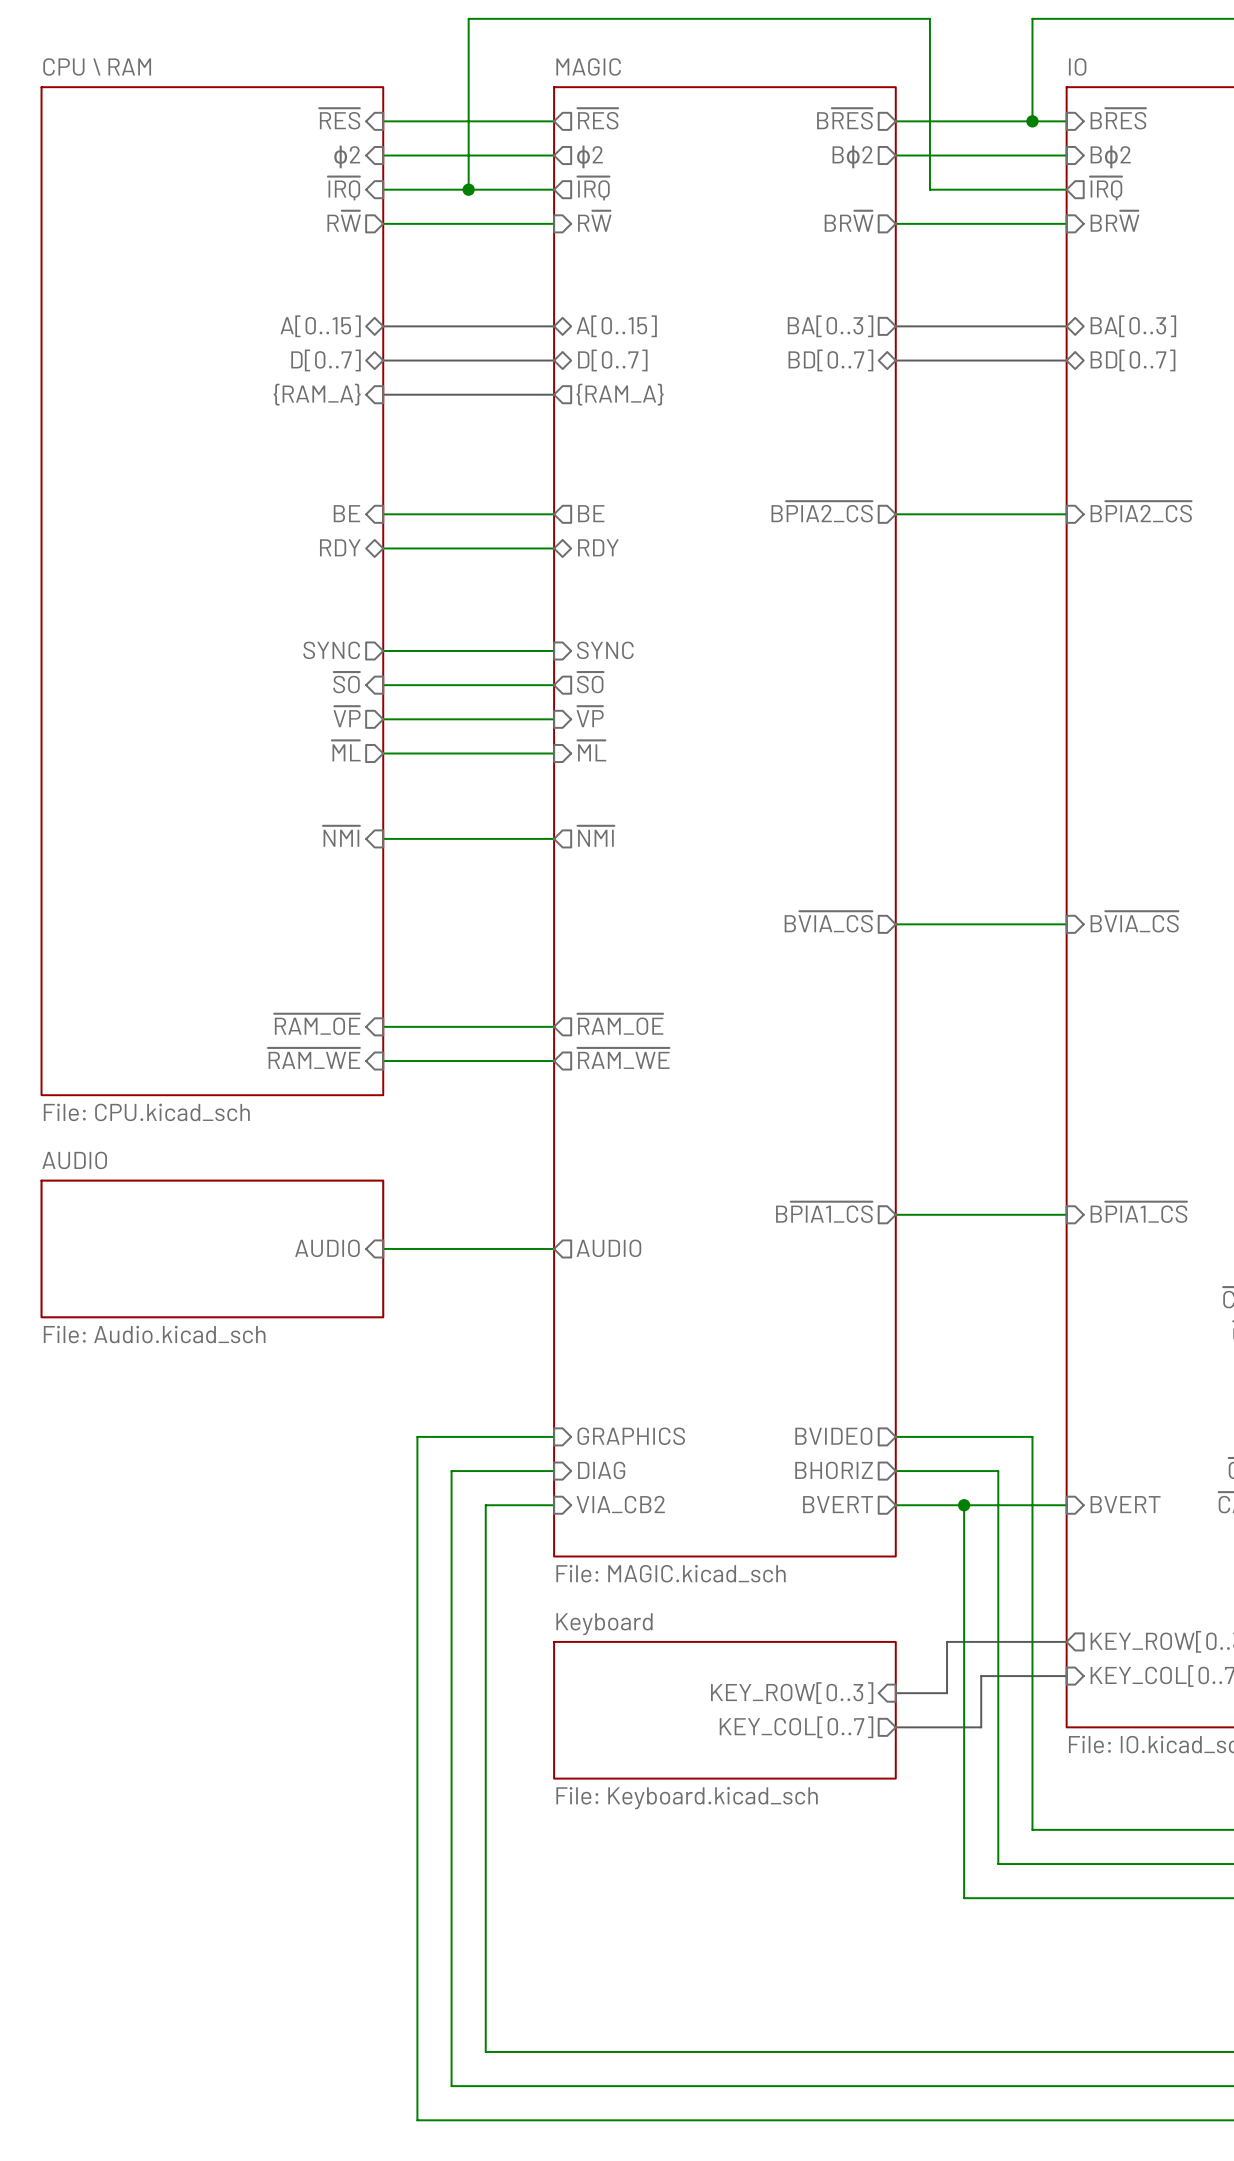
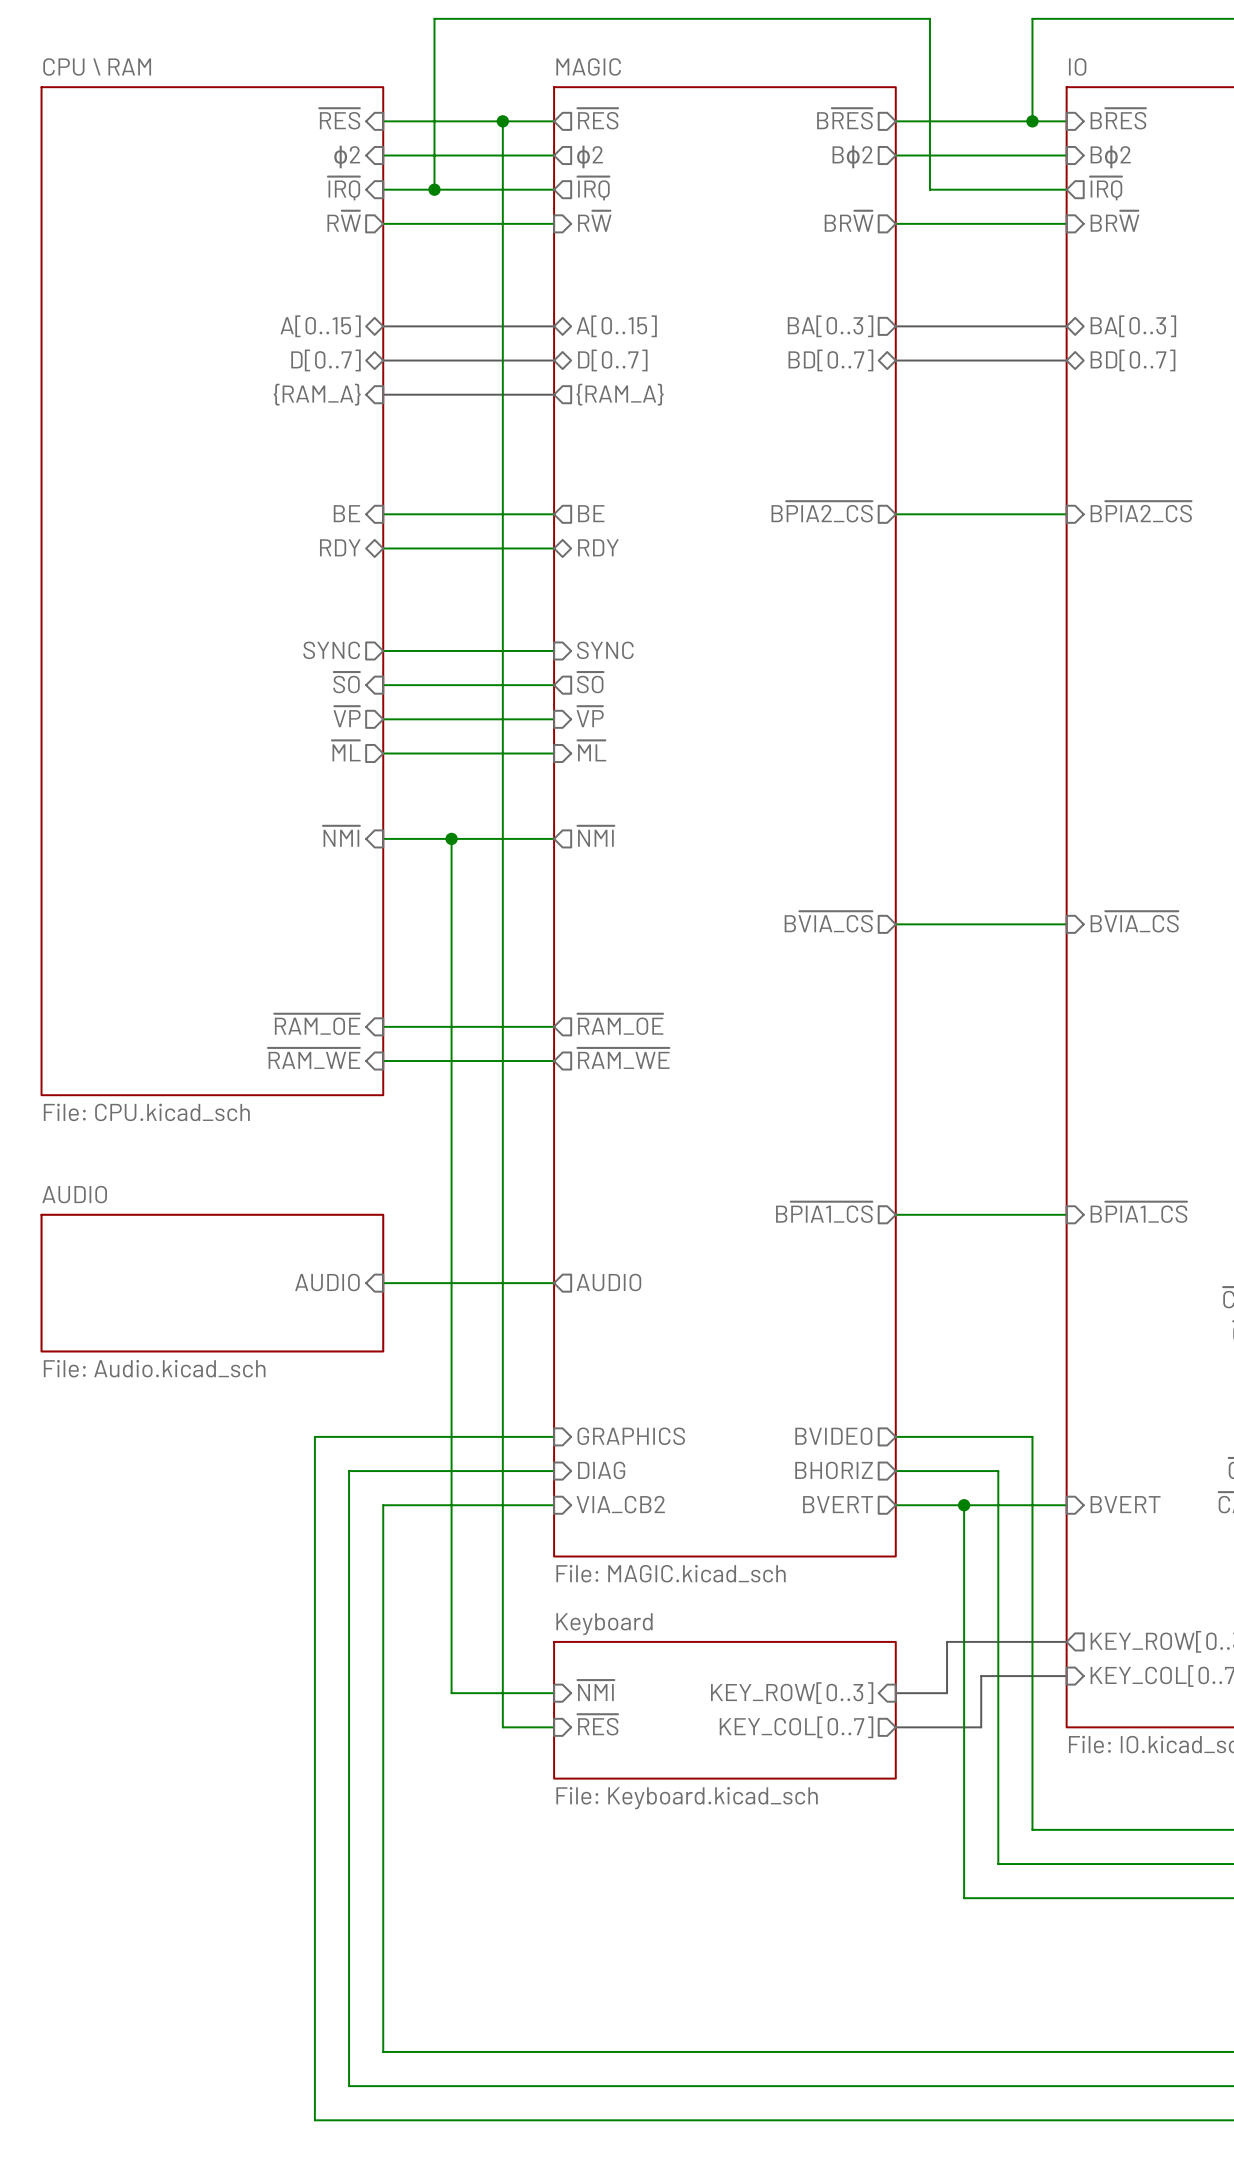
wire: (468, 18) (468, 189) -> (468, 18) (434, 18) (434, 189)
wire: none -> (502, 121) (502, 1727) (554, 1727)
junction: none -> (502, 121)
junction position: (468, 189) -> (434, 189)
wire: none -> (451, 838) (451, 1471) (349, 1471) (349, 2086) (451, 2086)
junction: none -> (451, 838)
sheet AUDIO position: (212, 1248) -> (212, 1283)
sheet pin position: AUDIO (327, 1248) -> AUDIO (327, 1282)
wire: (383, 1248) (554, 1248) -> (383, 1283) (554, 1283)
sheet pin position: AUDIO (608, 1248) -> AUDIO (608, 1282)
wire: (417, 1436) (417, 2120) -> (417, 1436) (314, 1436) (314, 2120) (417, 2120)
wire: (485, 1505) (485, 2051) -> (485, 1505) (383, 1505) (383, 2051) (485, 2051)
sheet pin: none -> ~{NMI} (595, 1690)
wire: (451, 1693) (451, 2086) -> (451, 1693) (554, 1693)
sheet pin: none -> ~{RES} (597, 1724)

